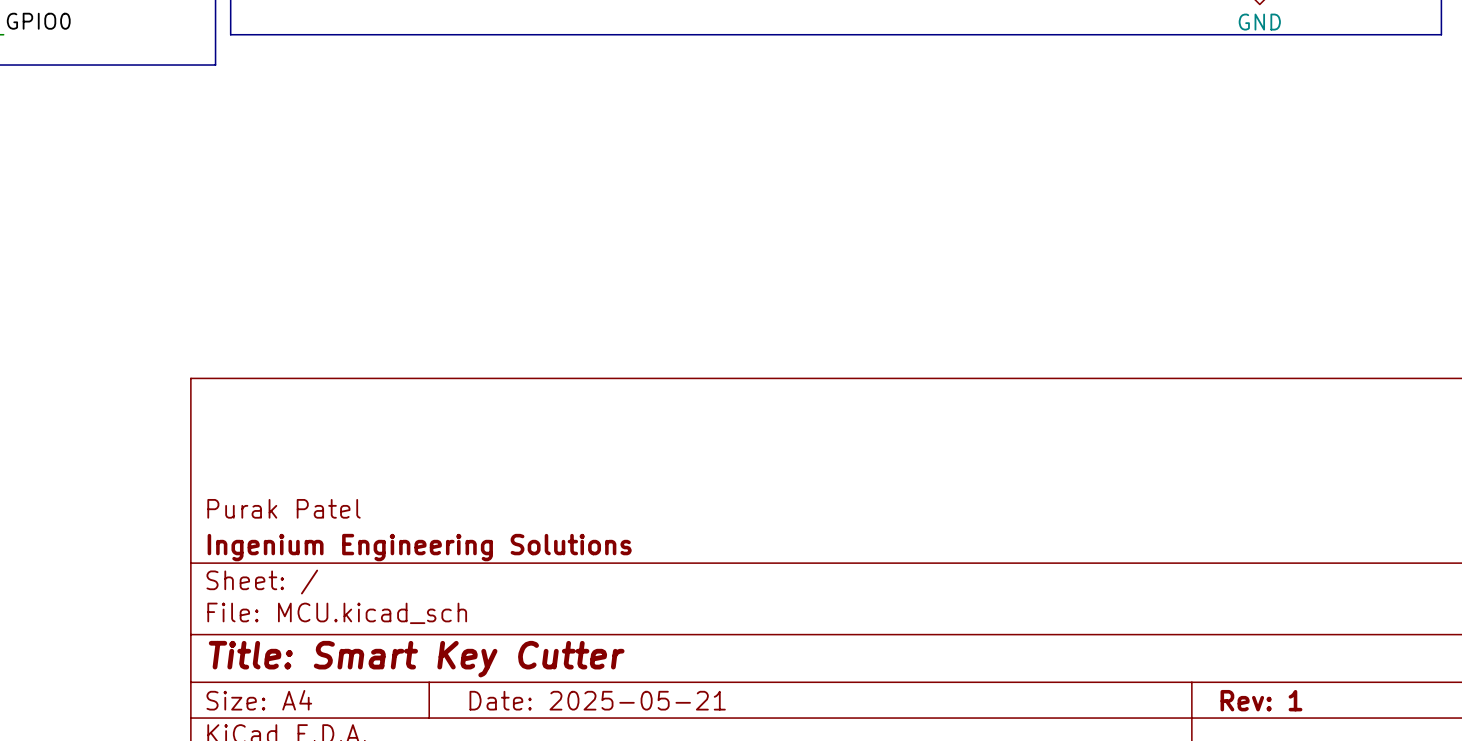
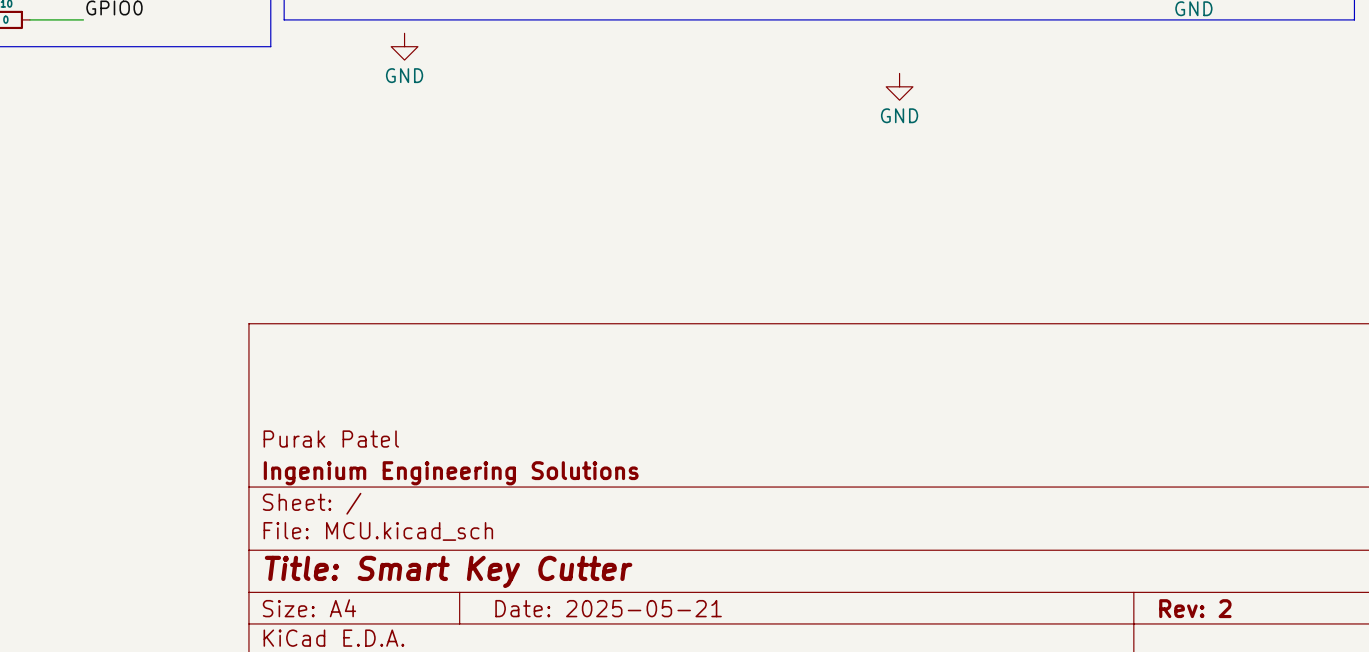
power symbol: none -> GND (404, 46)
power symbol: none -> GND (899, 86)
title block: Rev: 1 (1261, 700) -> Rev: 2 (1195, 608)

